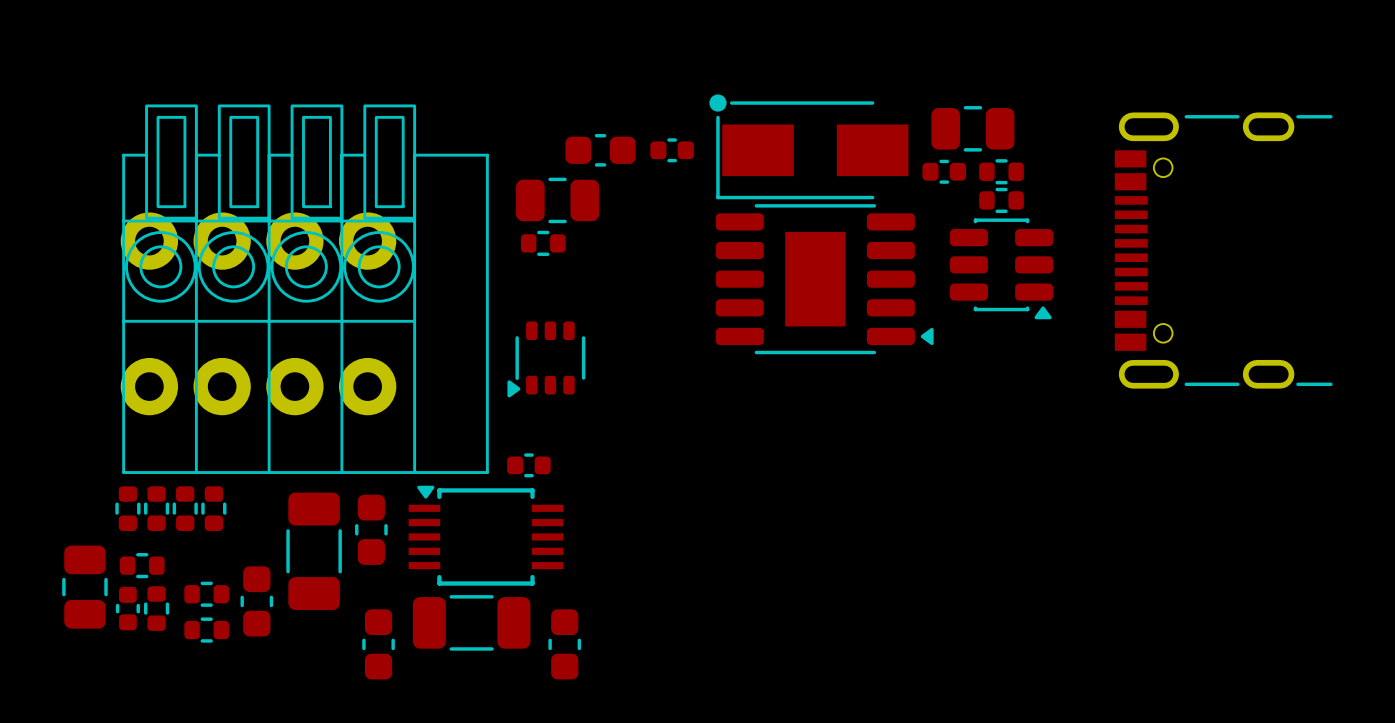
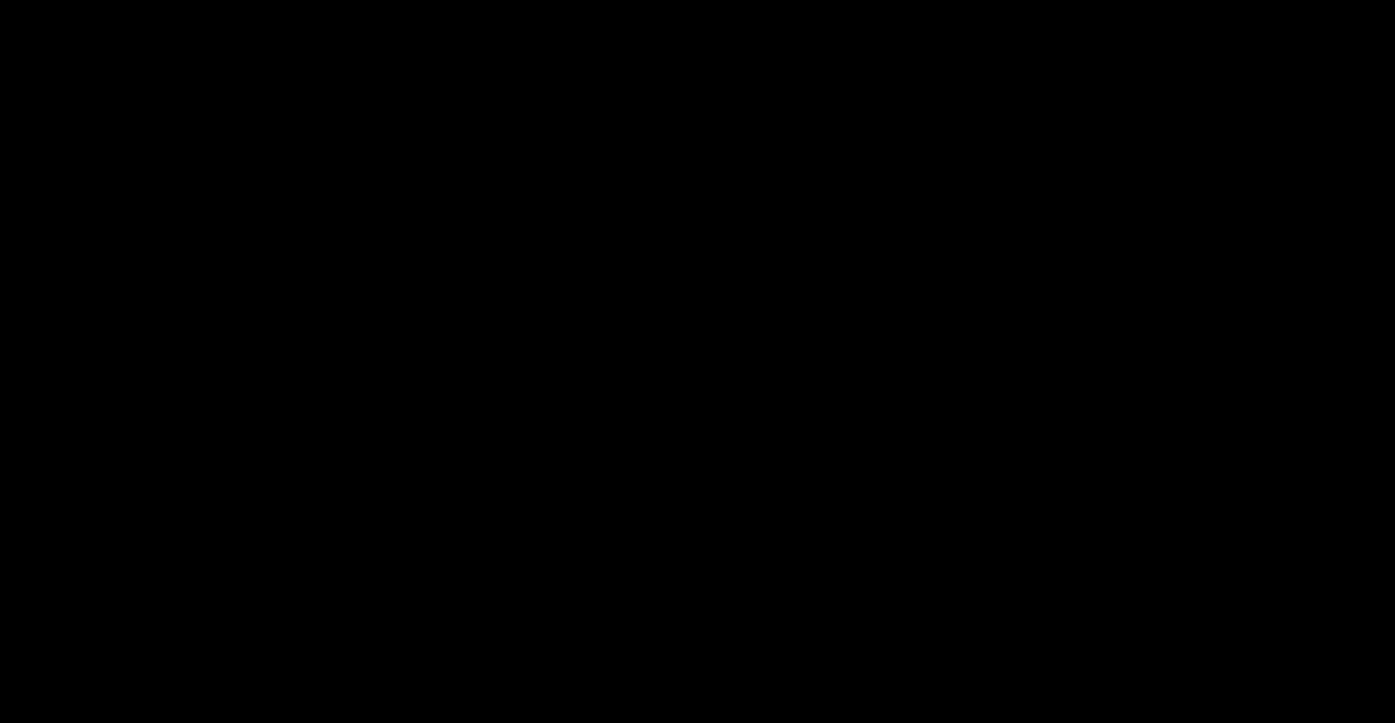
part: (972, 128) -> none
part: (808, 146) -> none
part: (600, 150) -> none
part: (672, 150) -> none
part: (944, 171) -> none
part: (1001, 171) -> none
part: (557, 200) -> none
part: (1001, 200) -> none
part: (543, 243) -> none
part: (1223, 250) -> none
part: (1001, 268) -> none
part: (824, 279) -> none
part: (304, 289) -> none
part: (546, 359) -> none
part: (528, 465) -> none
part: (127, 508) -> none
part: (156, 508) -> none
part: (185, 508) -> none
part: (213, 508) -> none
part: (371, 529) -> none
part: (485, 535) -> none
part: (314, 551) -> none
part: (142, 565) -> none
part: (84, 587) -> none
part: (206, 594) -> none
part: (256, 601) -> none
part: (127, 608) -> none
part: (156, 608) -> none
part: (471, 622) -> none
part: (206, 630) -> none
part: (378, 644) -> none
part: (564, 644) -> none

